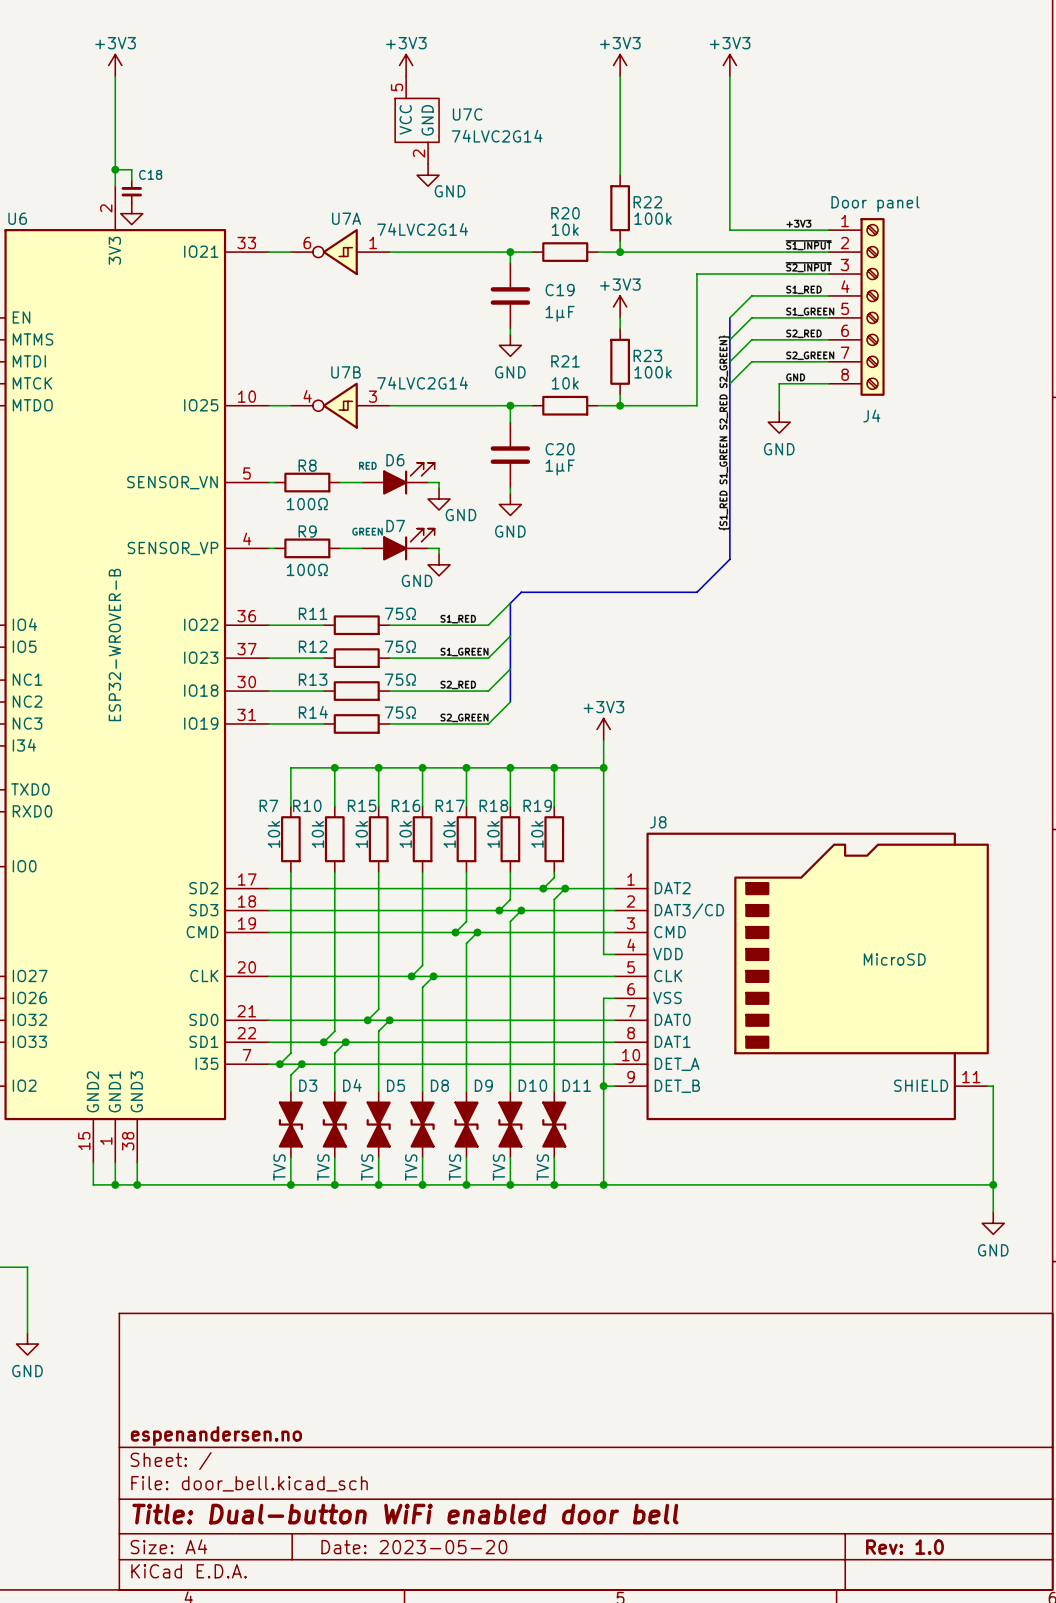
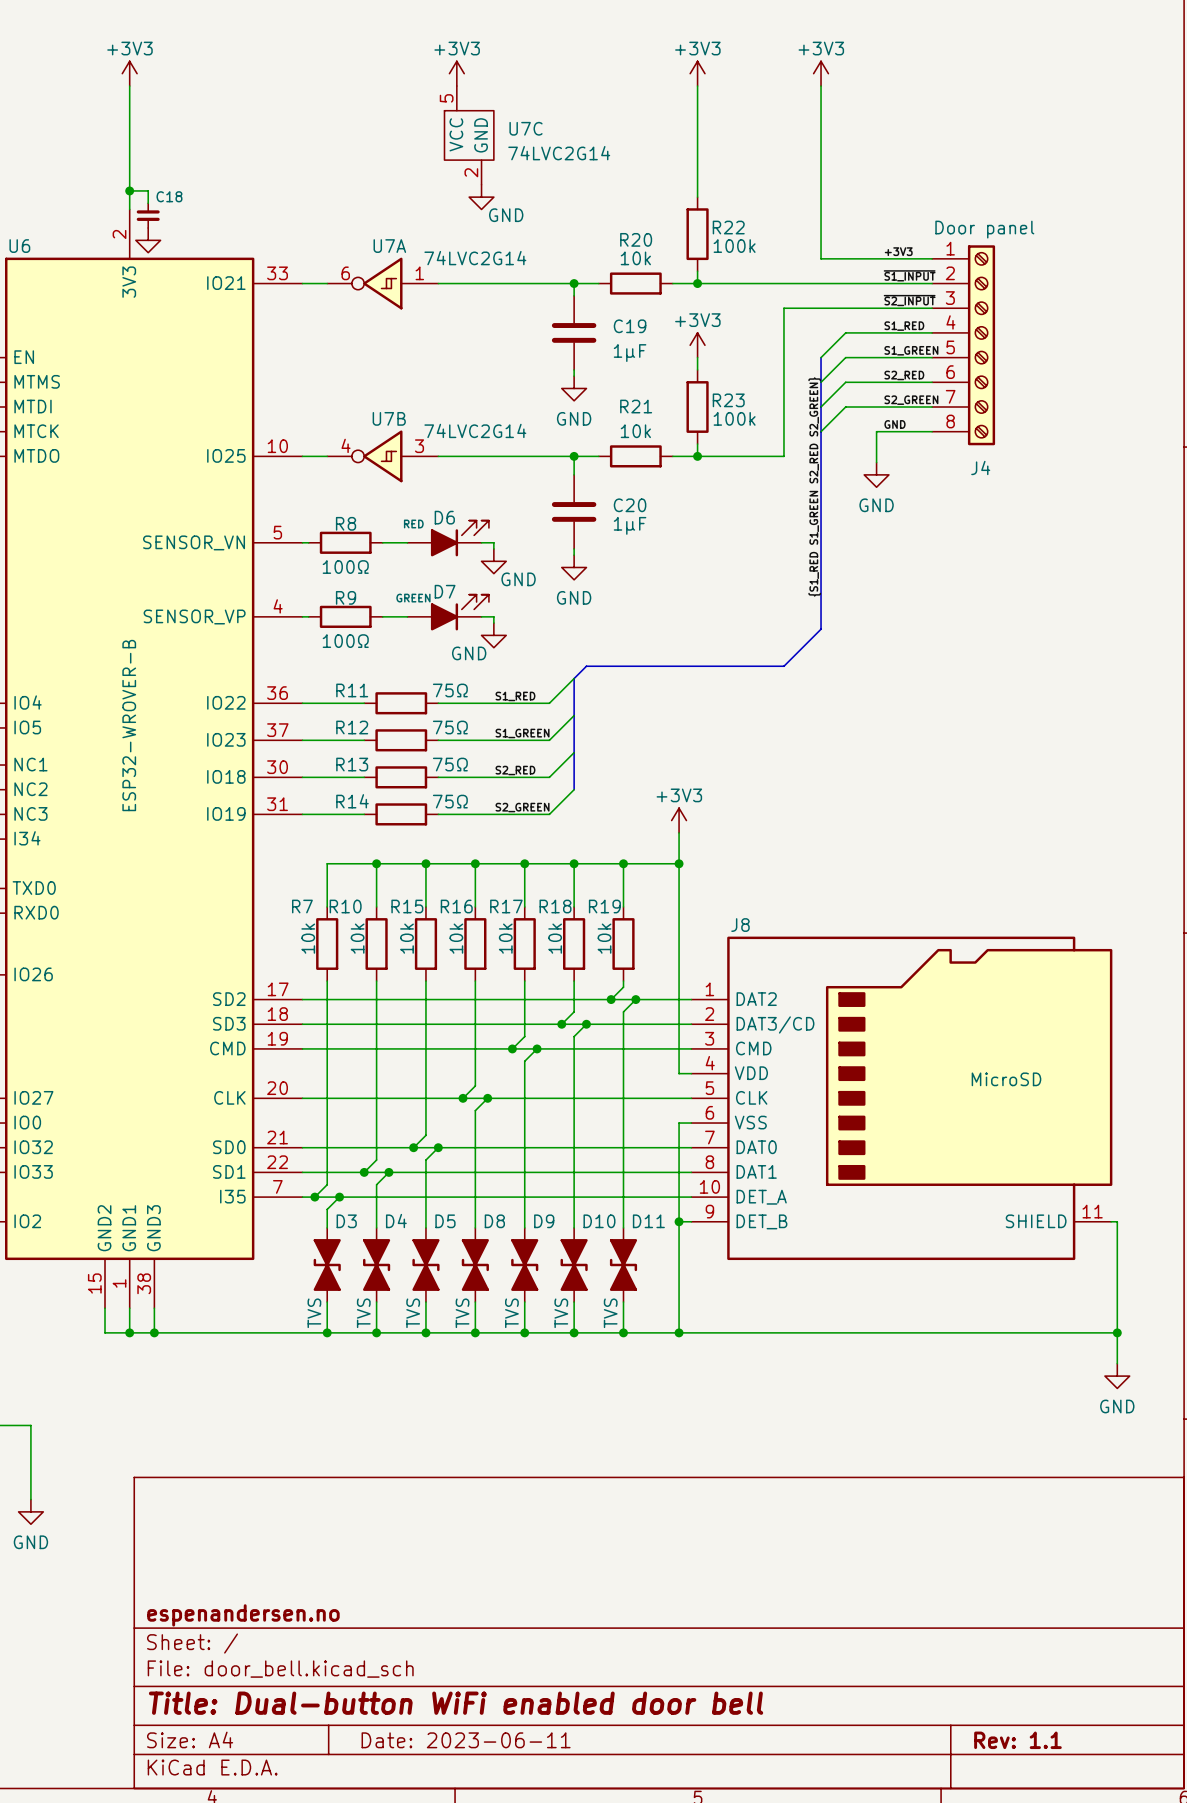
U6 pin name: IO0 (24, 866) -> IO26 (33, 974)
U6 pin name: IO26 (29, 997) -> IO0 (27, 1122)
title block: Date: 2023-05-20 (414, 1547) -> Date: 2023-06-11 (466, 1740)
title block: Rev: 1.0 (904, 1547) -> Rev: 1.1 (1017, 1740)

